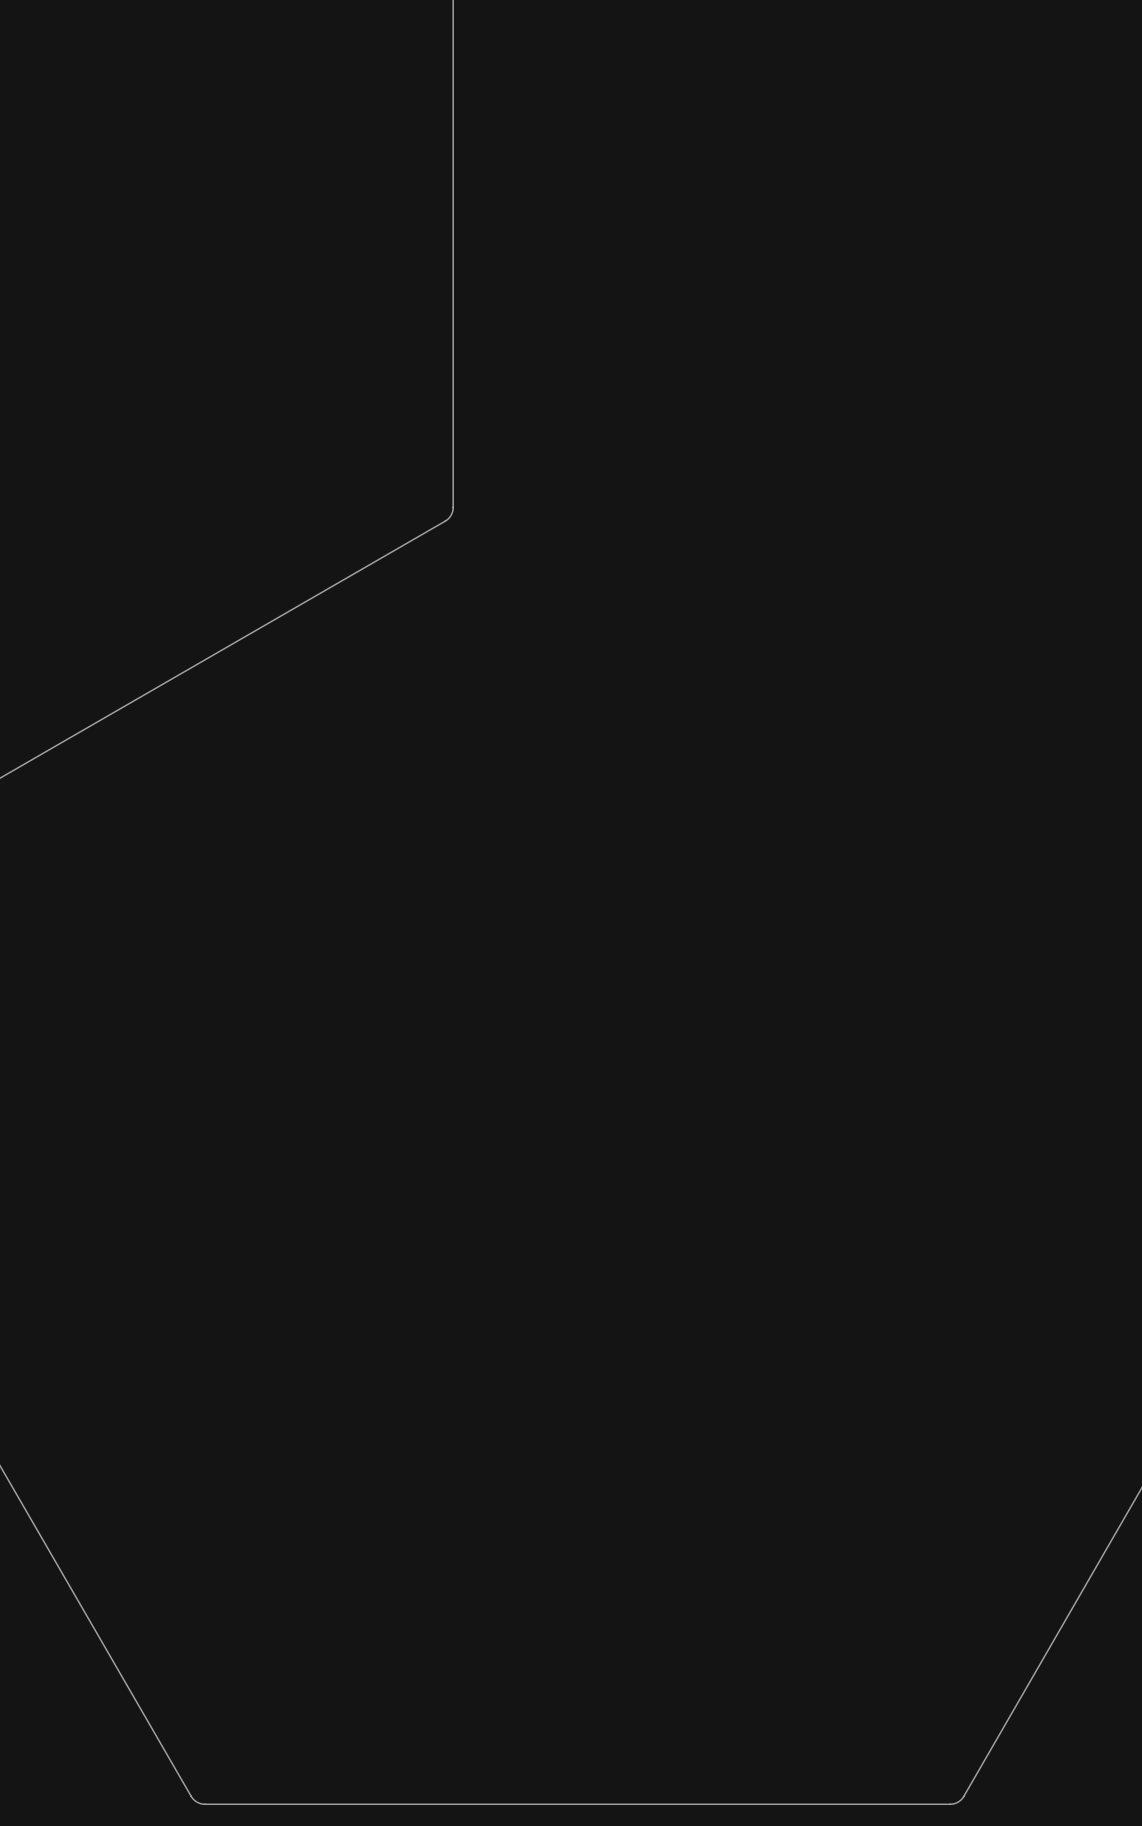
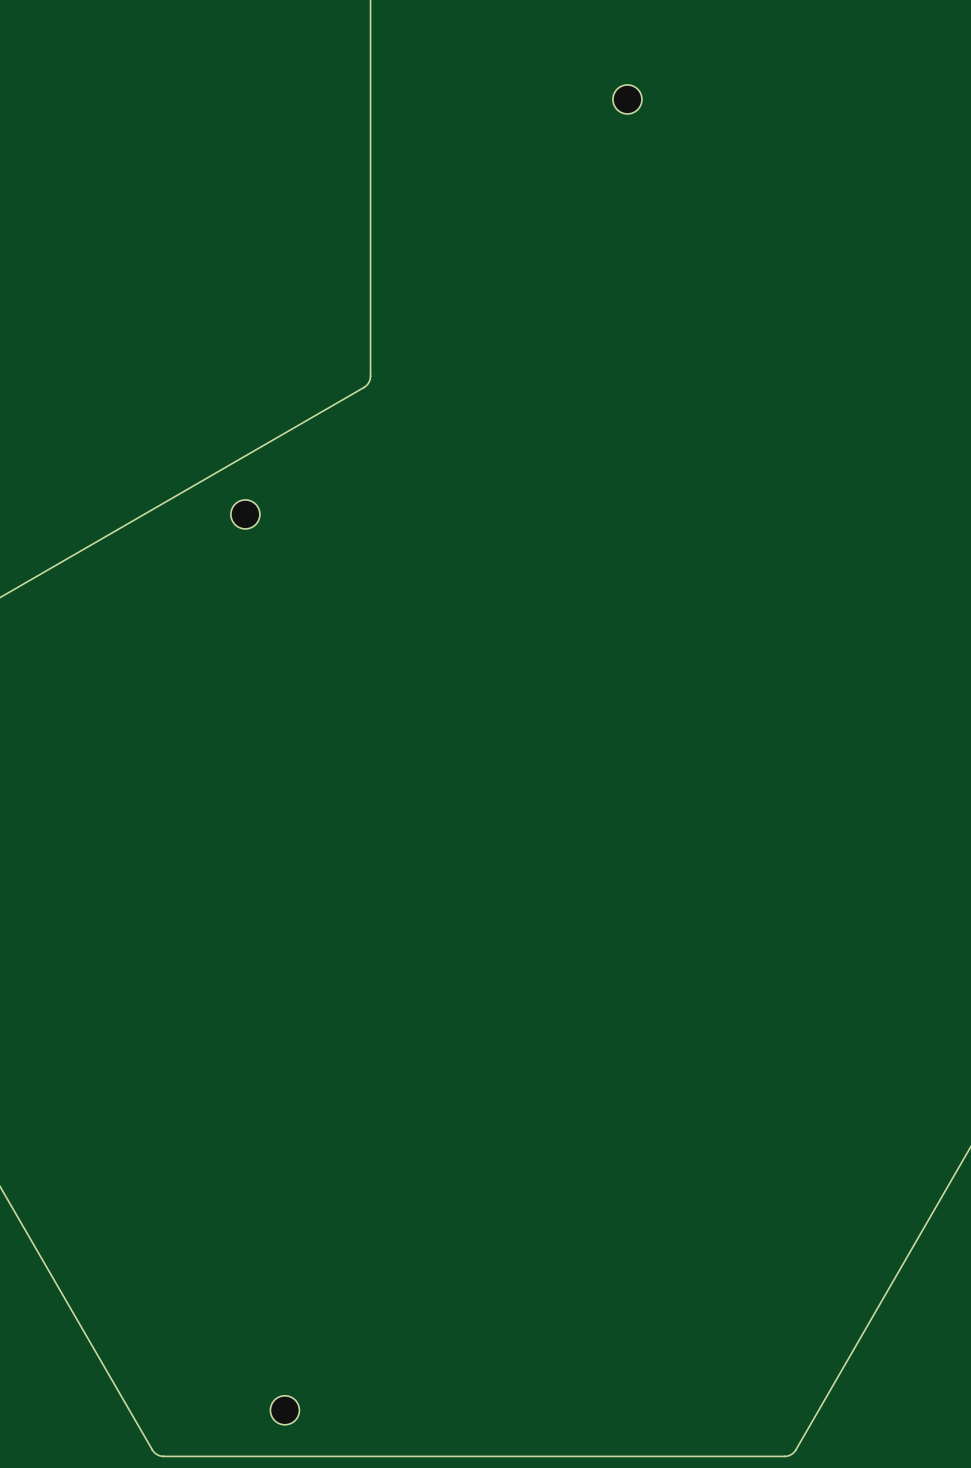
part: none -> (627, 99)
part: none -> (245, 514)
part: none -> (284, 1410)

